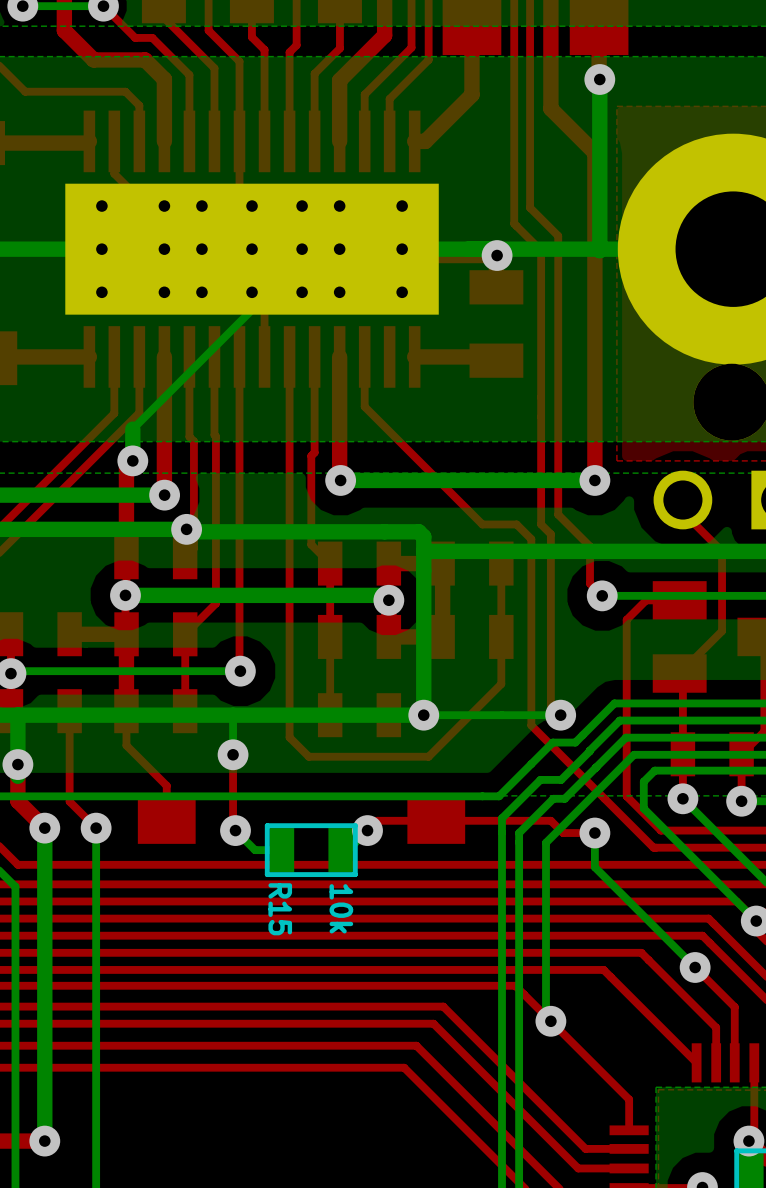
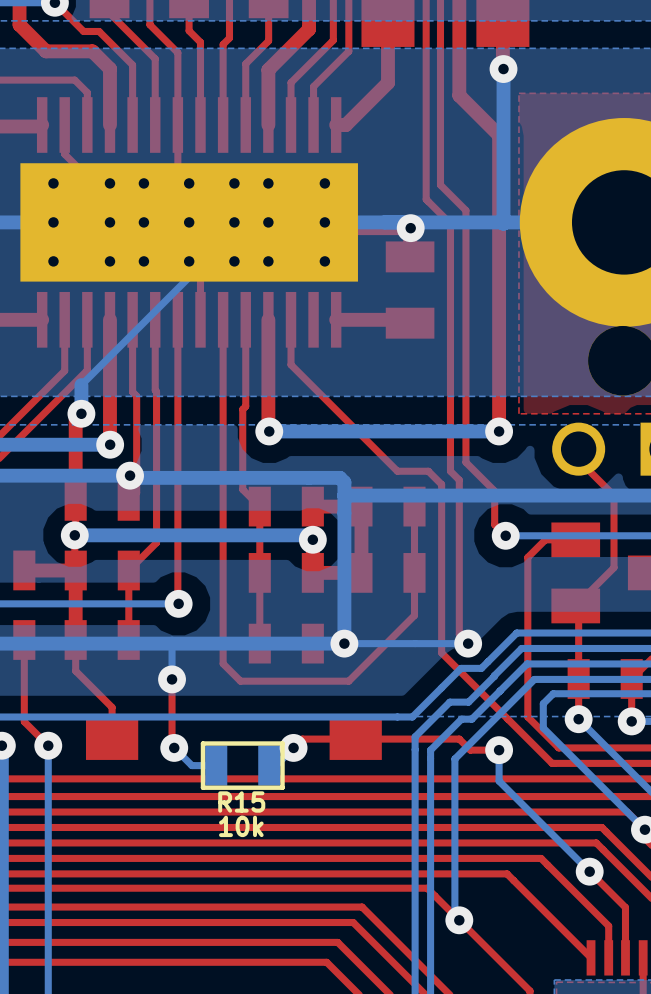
R15 value rotation: 0° (341, 908) -> 90° counterclockwise (241, 826)
R15 name rotation: 0° (280, 909) -> 90° counterclockwise (241, 801)

